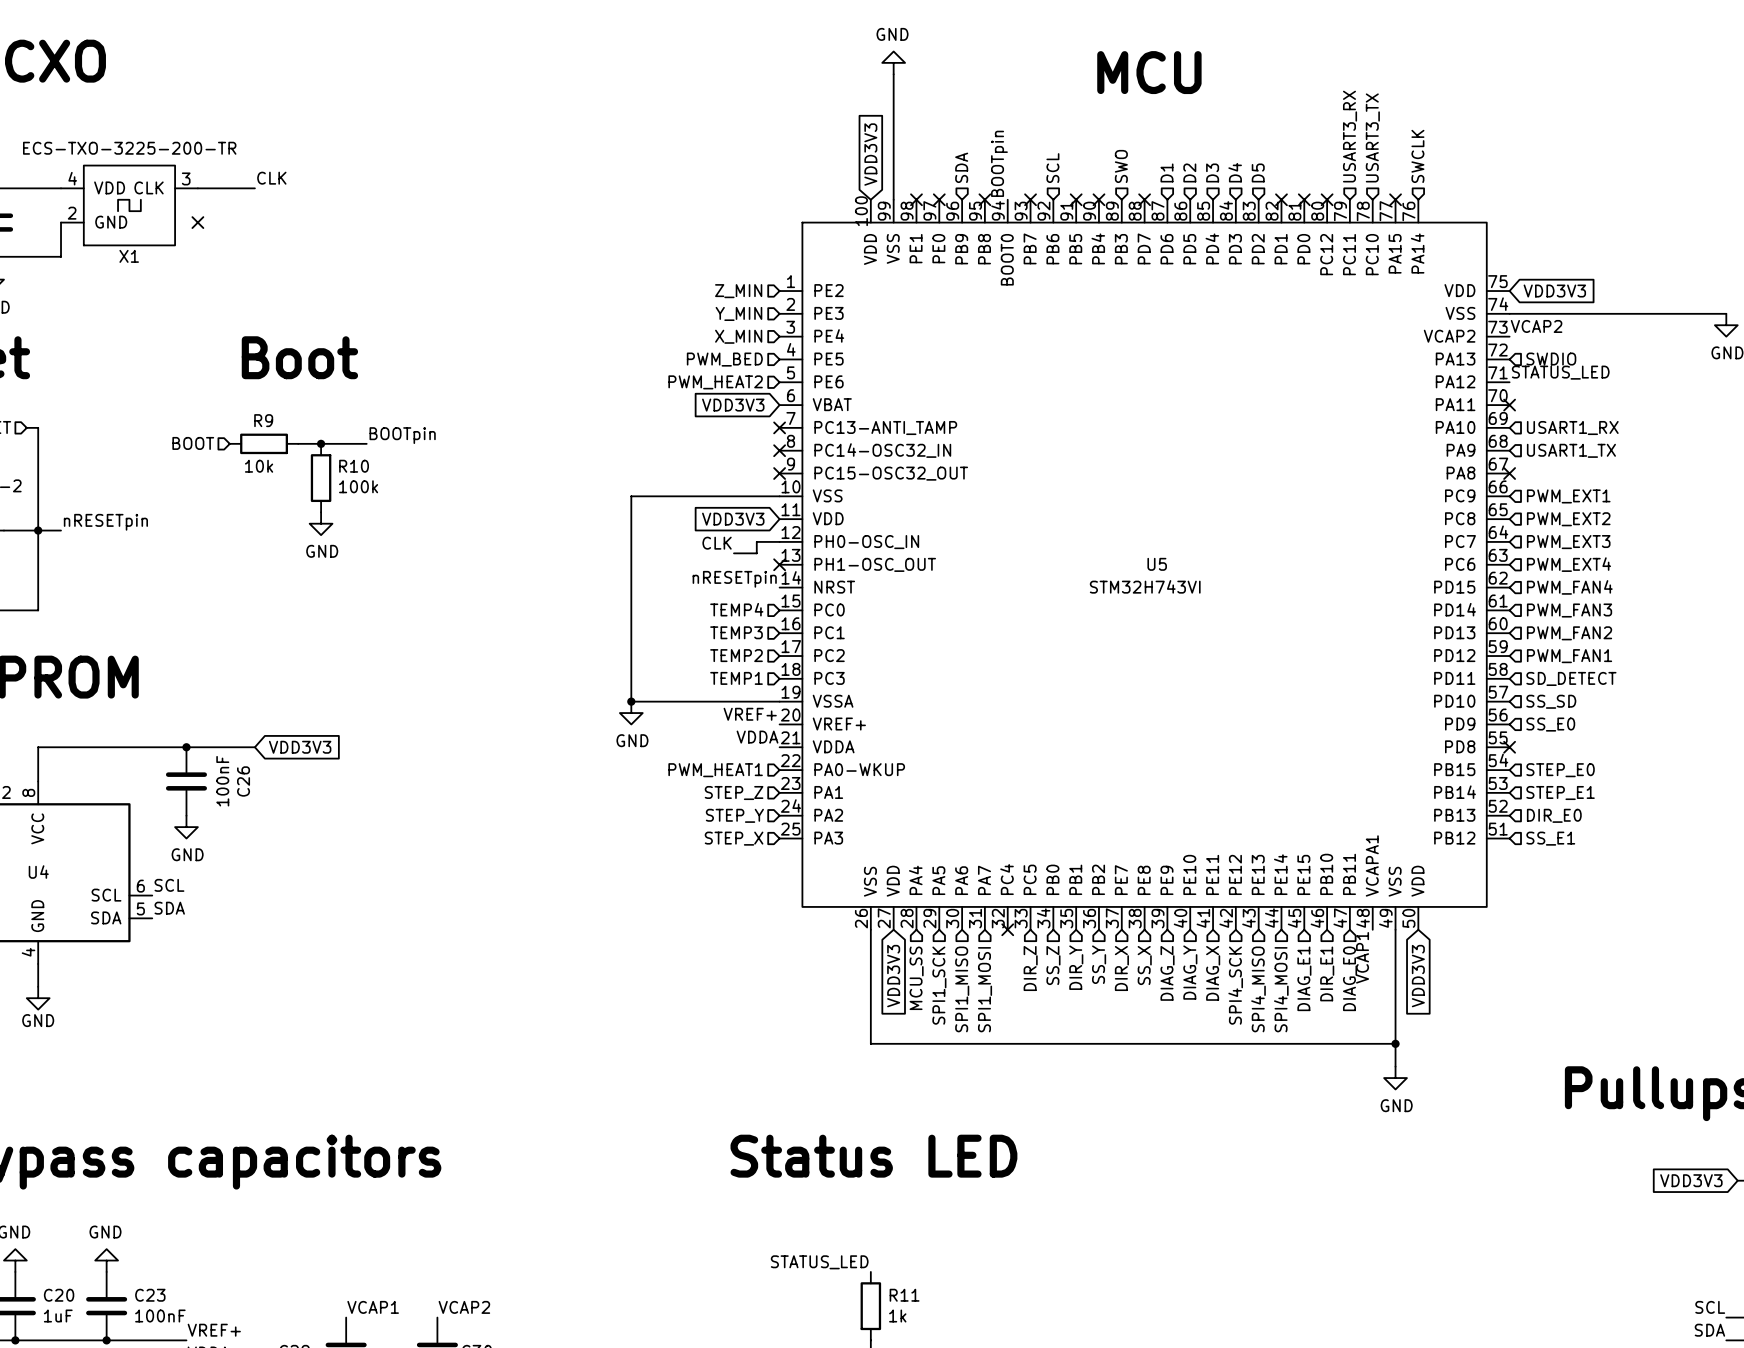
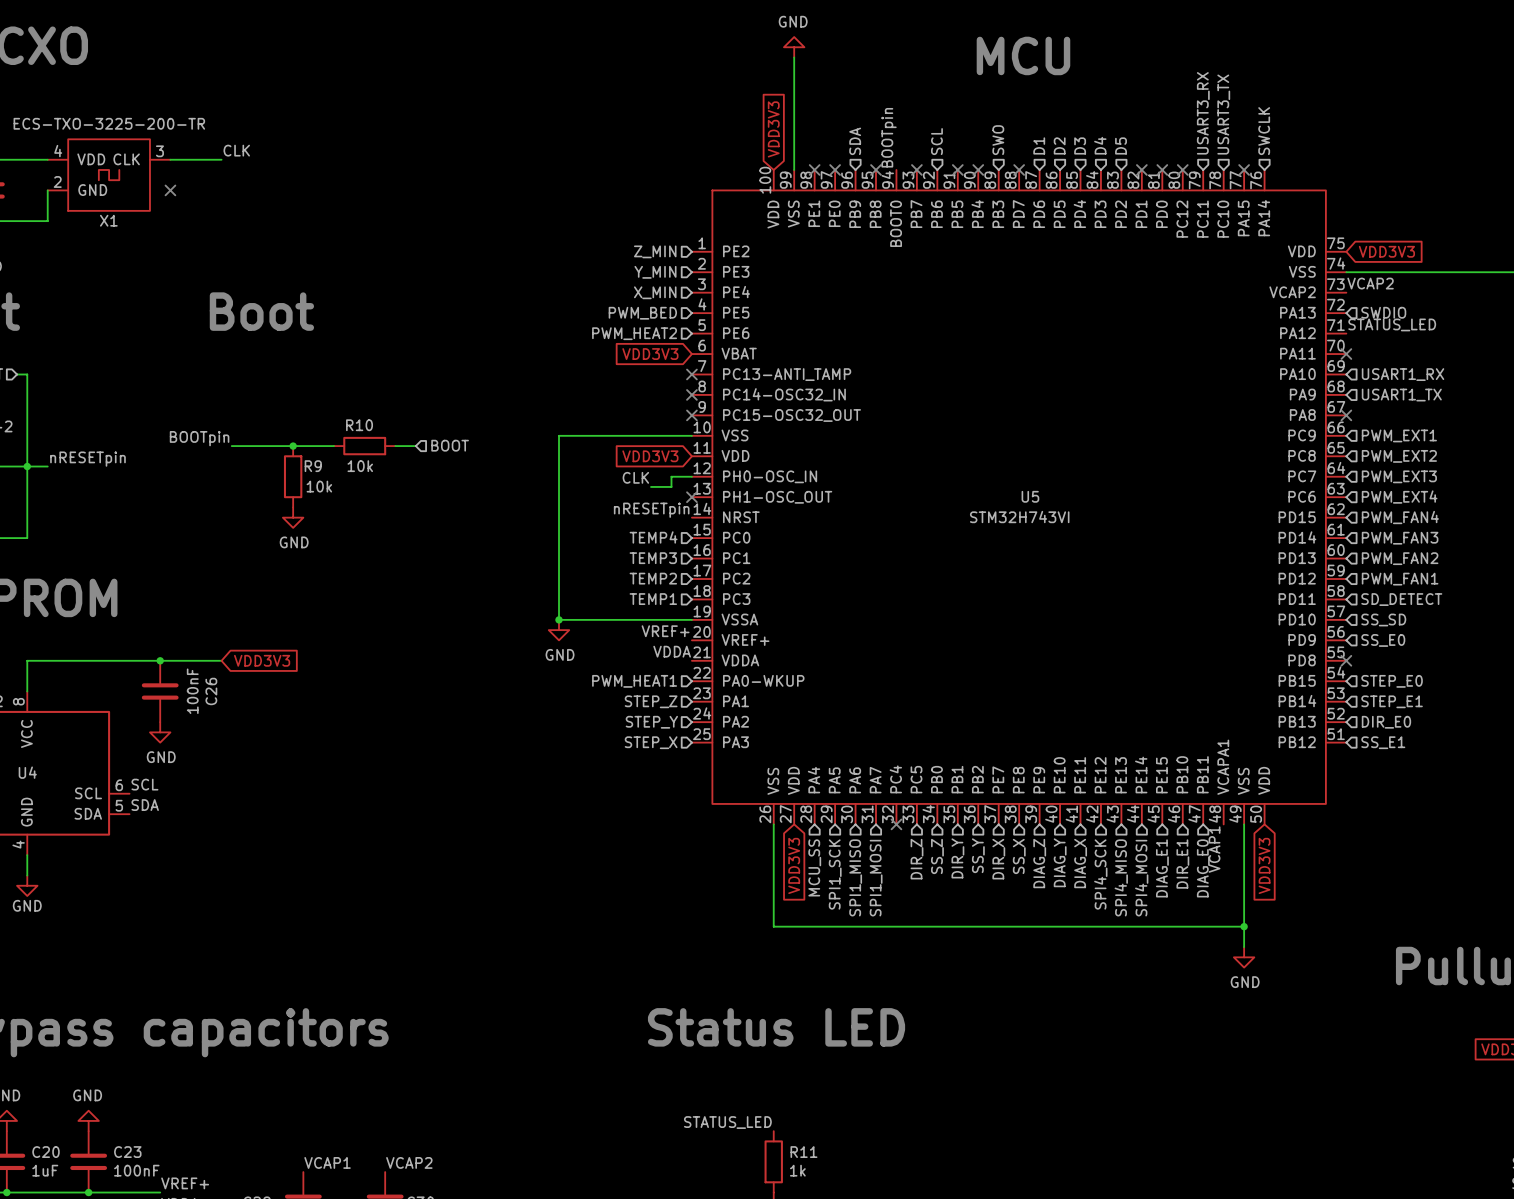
label position: BOOTpin (402, 435) -> BOOTpin (199, 438)
hierarchical label: BOOT (193, 443) -> none
R9 rotation: 0° (264, 443) -> 90° clockwise (293, 476)
R9 position: (264, 443) -> (293, 476)
wire: (298, 443) (366, 443) -> none
junction: (321, 443) -> none
R9 value position: 10k (259, 466) -> 10k (319, 486)
R10 name position: R10 (354, 466) -> R10 (359, 425)
R10 rotation: 0° (321, 478) -> 90° clockwise (364, 446)
R10 position: (321, 478) -> (364, 446)
R10 value: 100k (358, 486) -> 10k (360, 466)
wire: none -> (231, 446) (334, 446)
junction: none -> (293, 446)
wire: none -> (395, 446) (415, 446)
hierarchical label: none -> BOOT (450, 445)
power symbol position: GND (321, 523) -> GND (293, 517)

